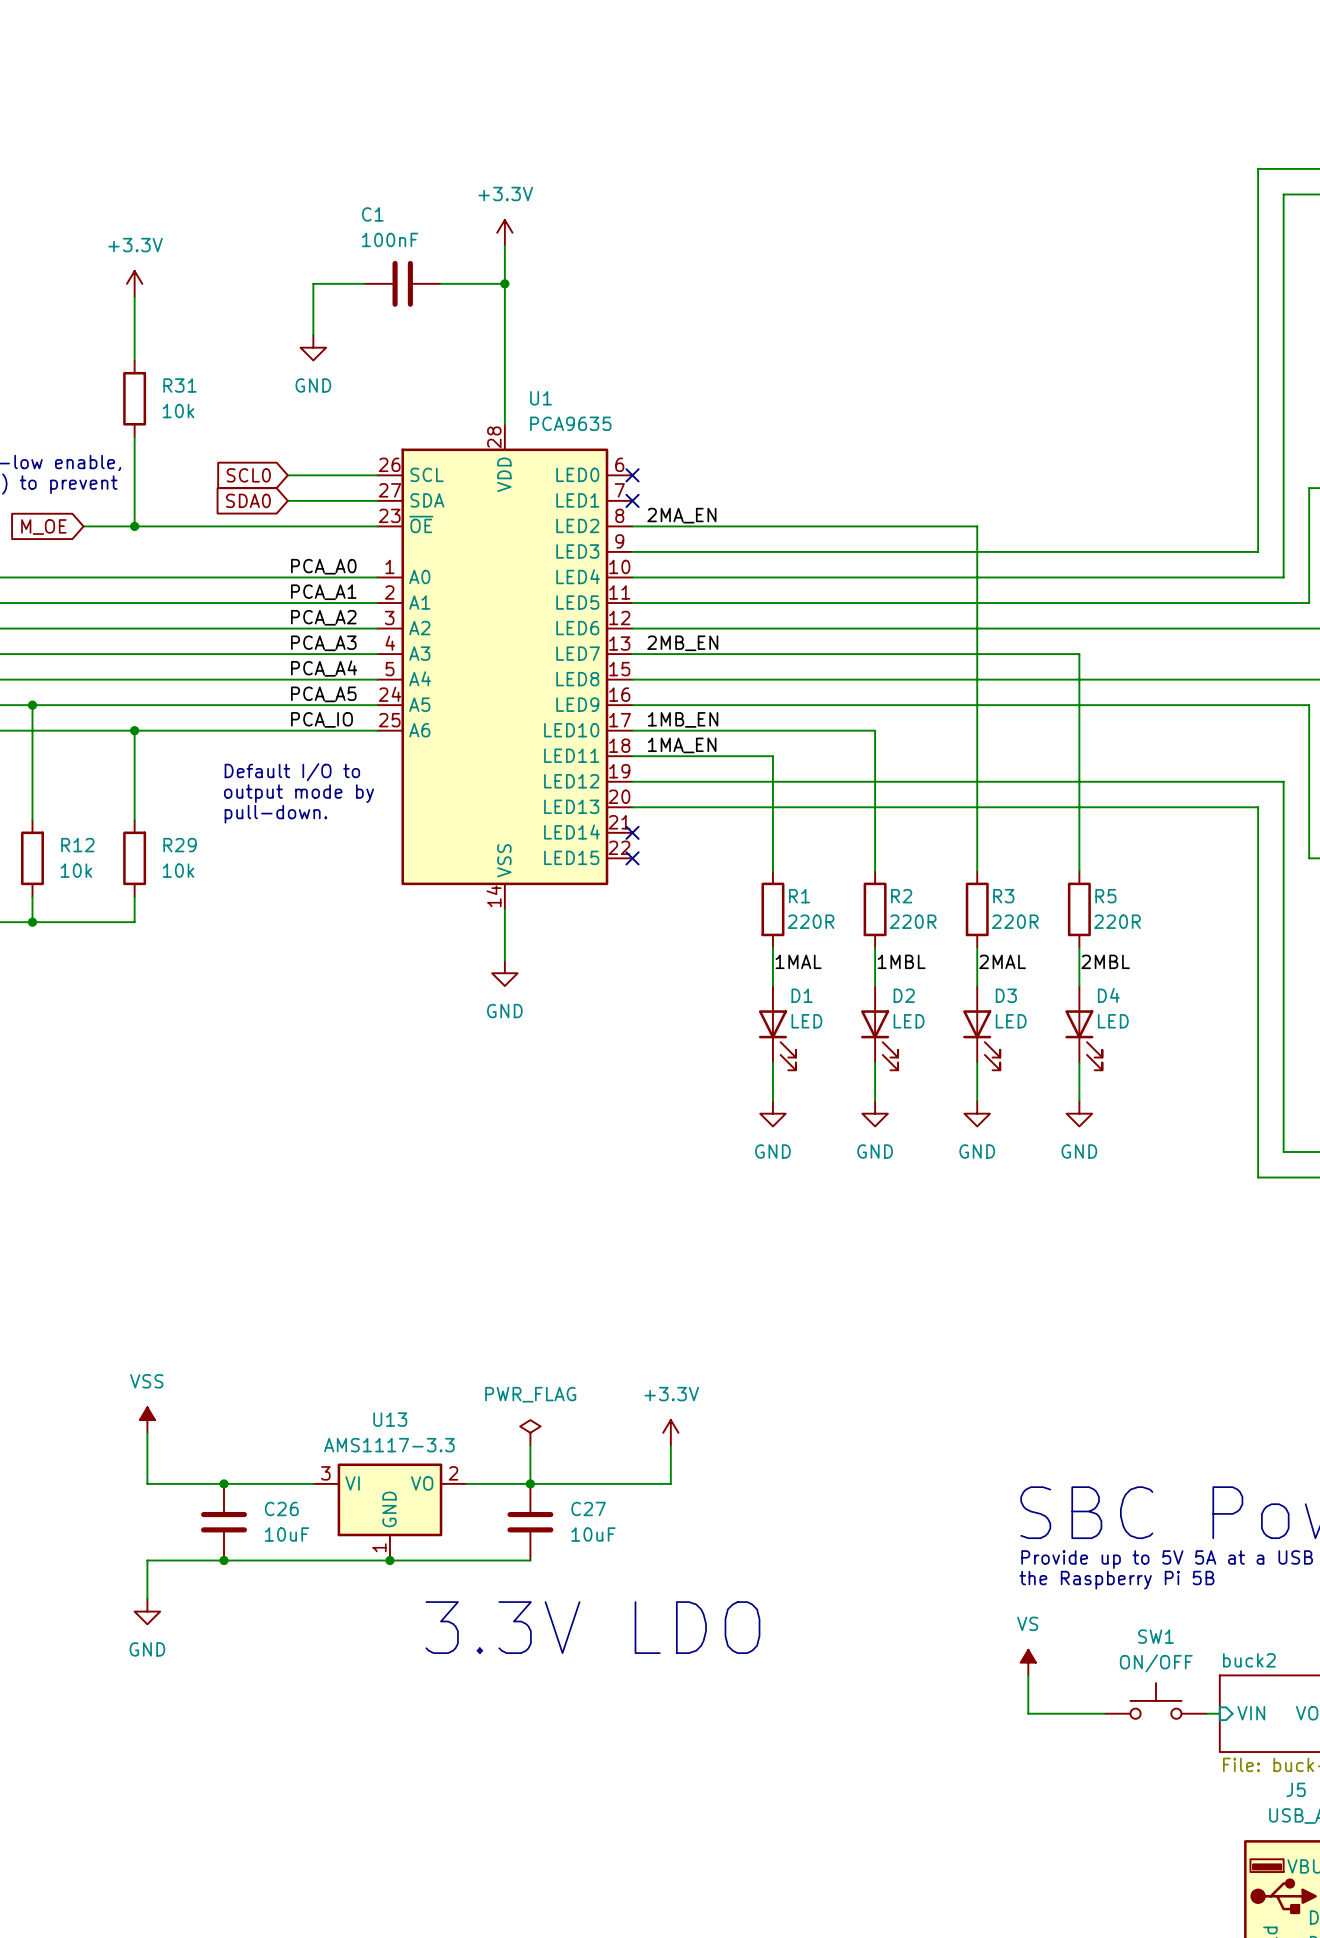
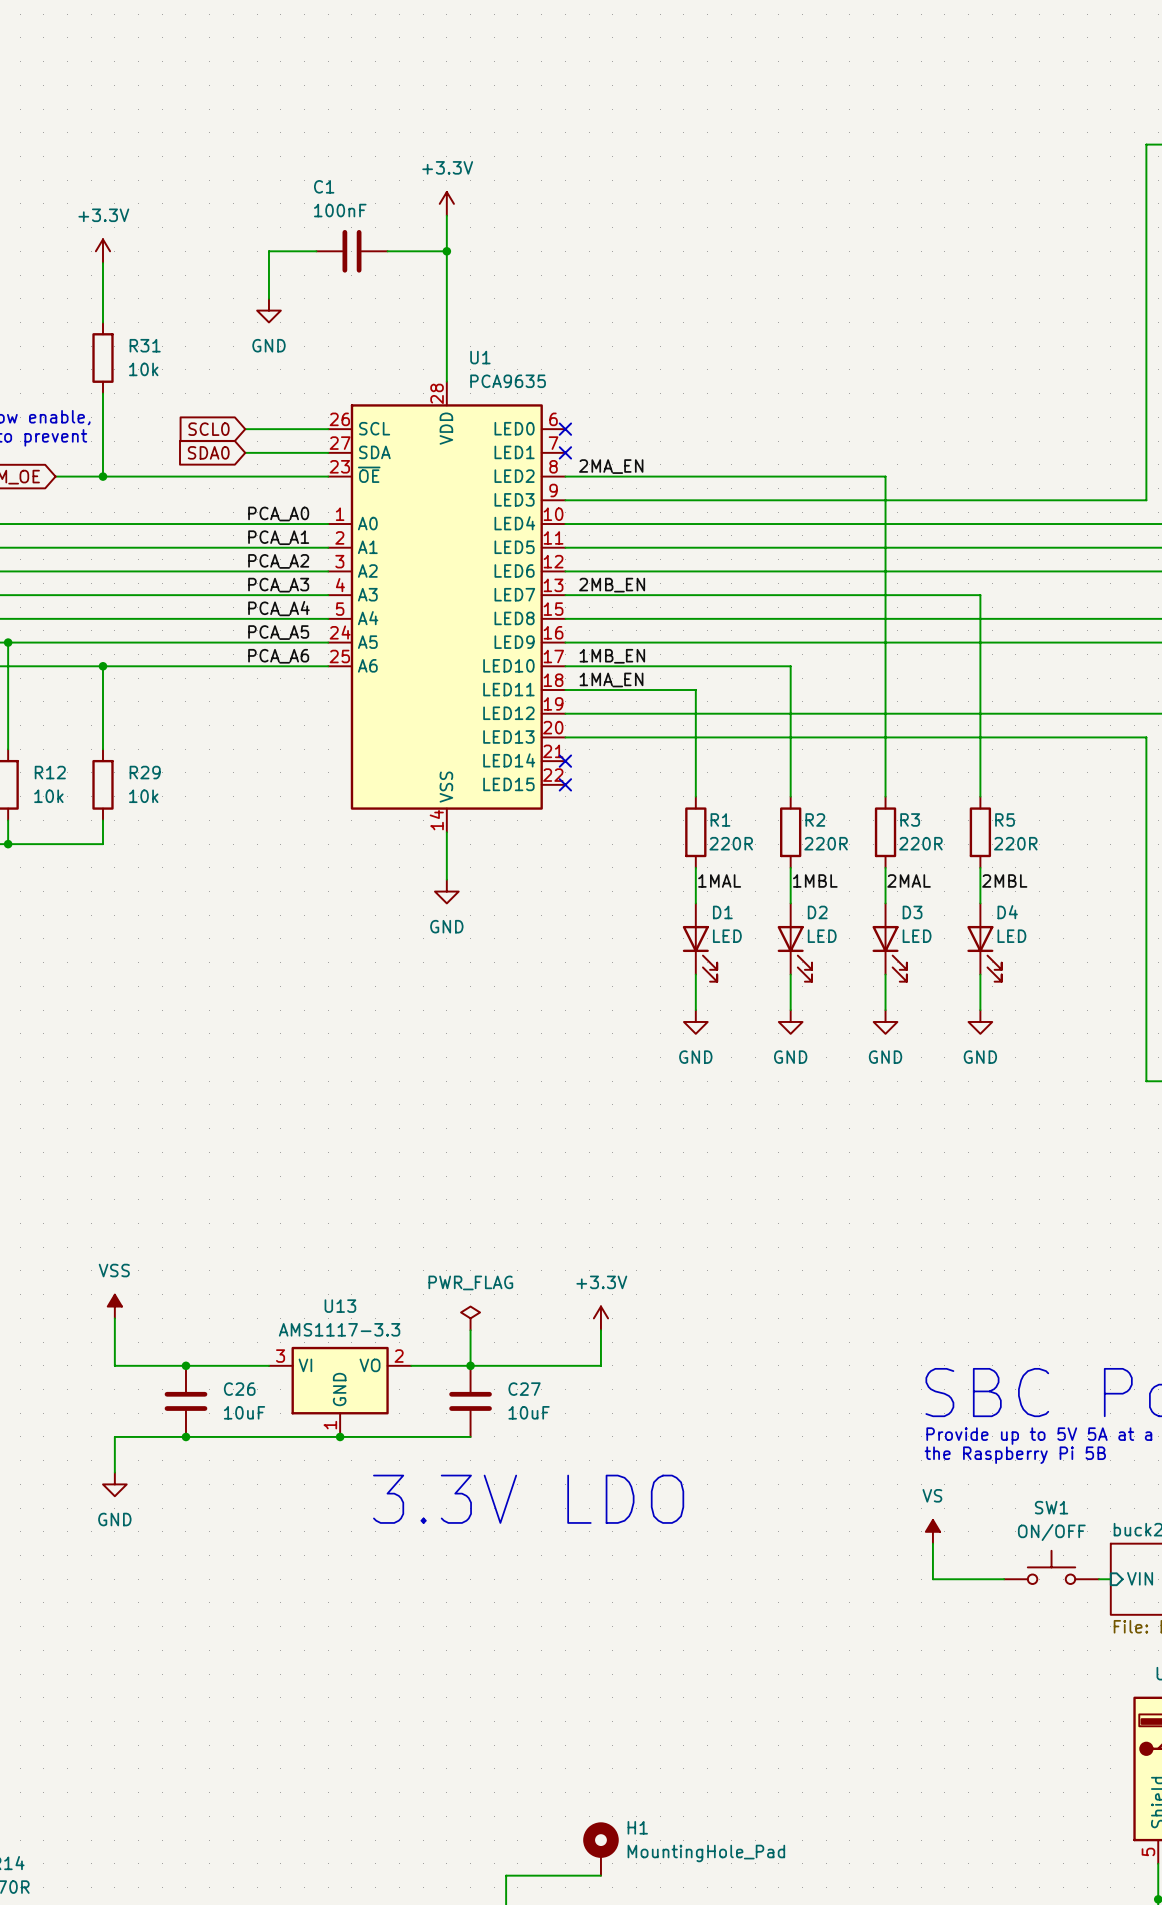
label: PCA_IO (321, 719) -> PCA_A6 (278, 656)
text: Default I/O to (292, 772) -> none
text: output mode by (299, 793) -> none
text: pull-down. (275, 814) -> none

